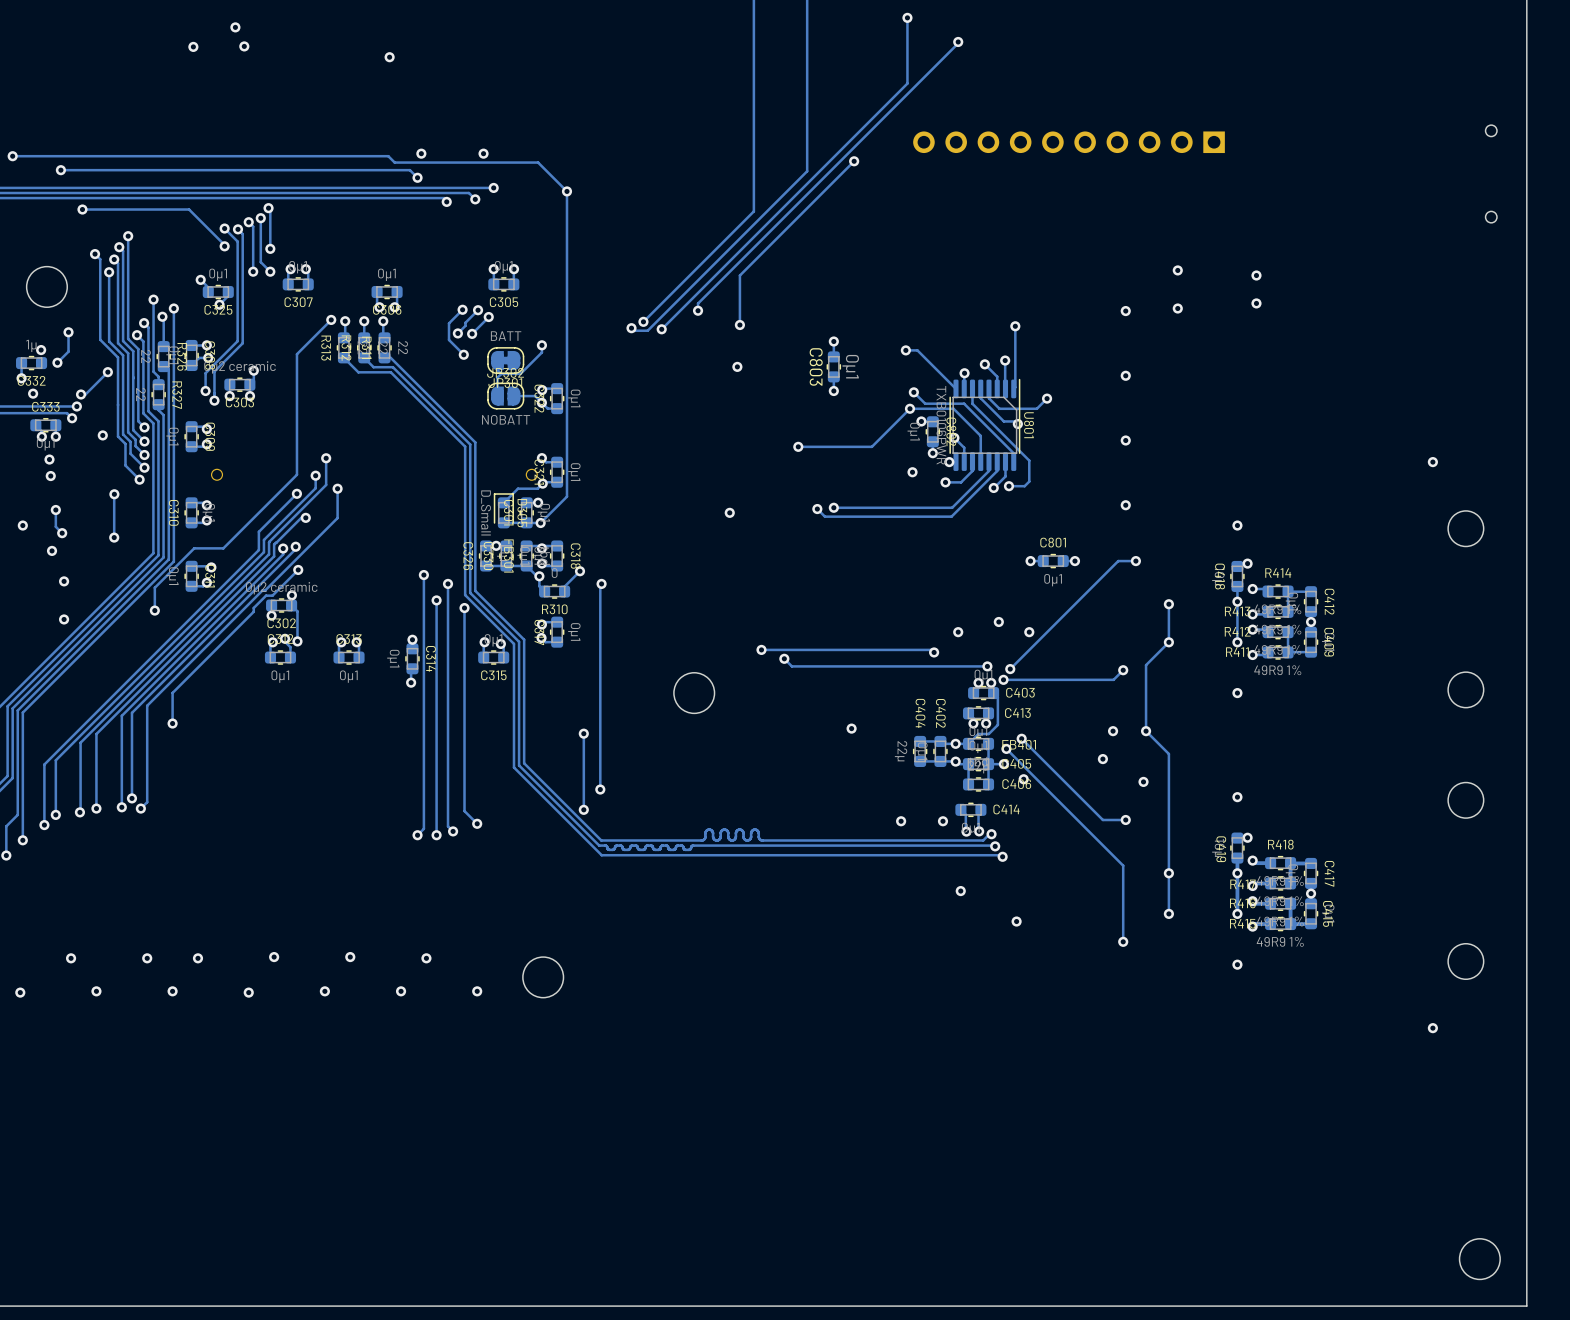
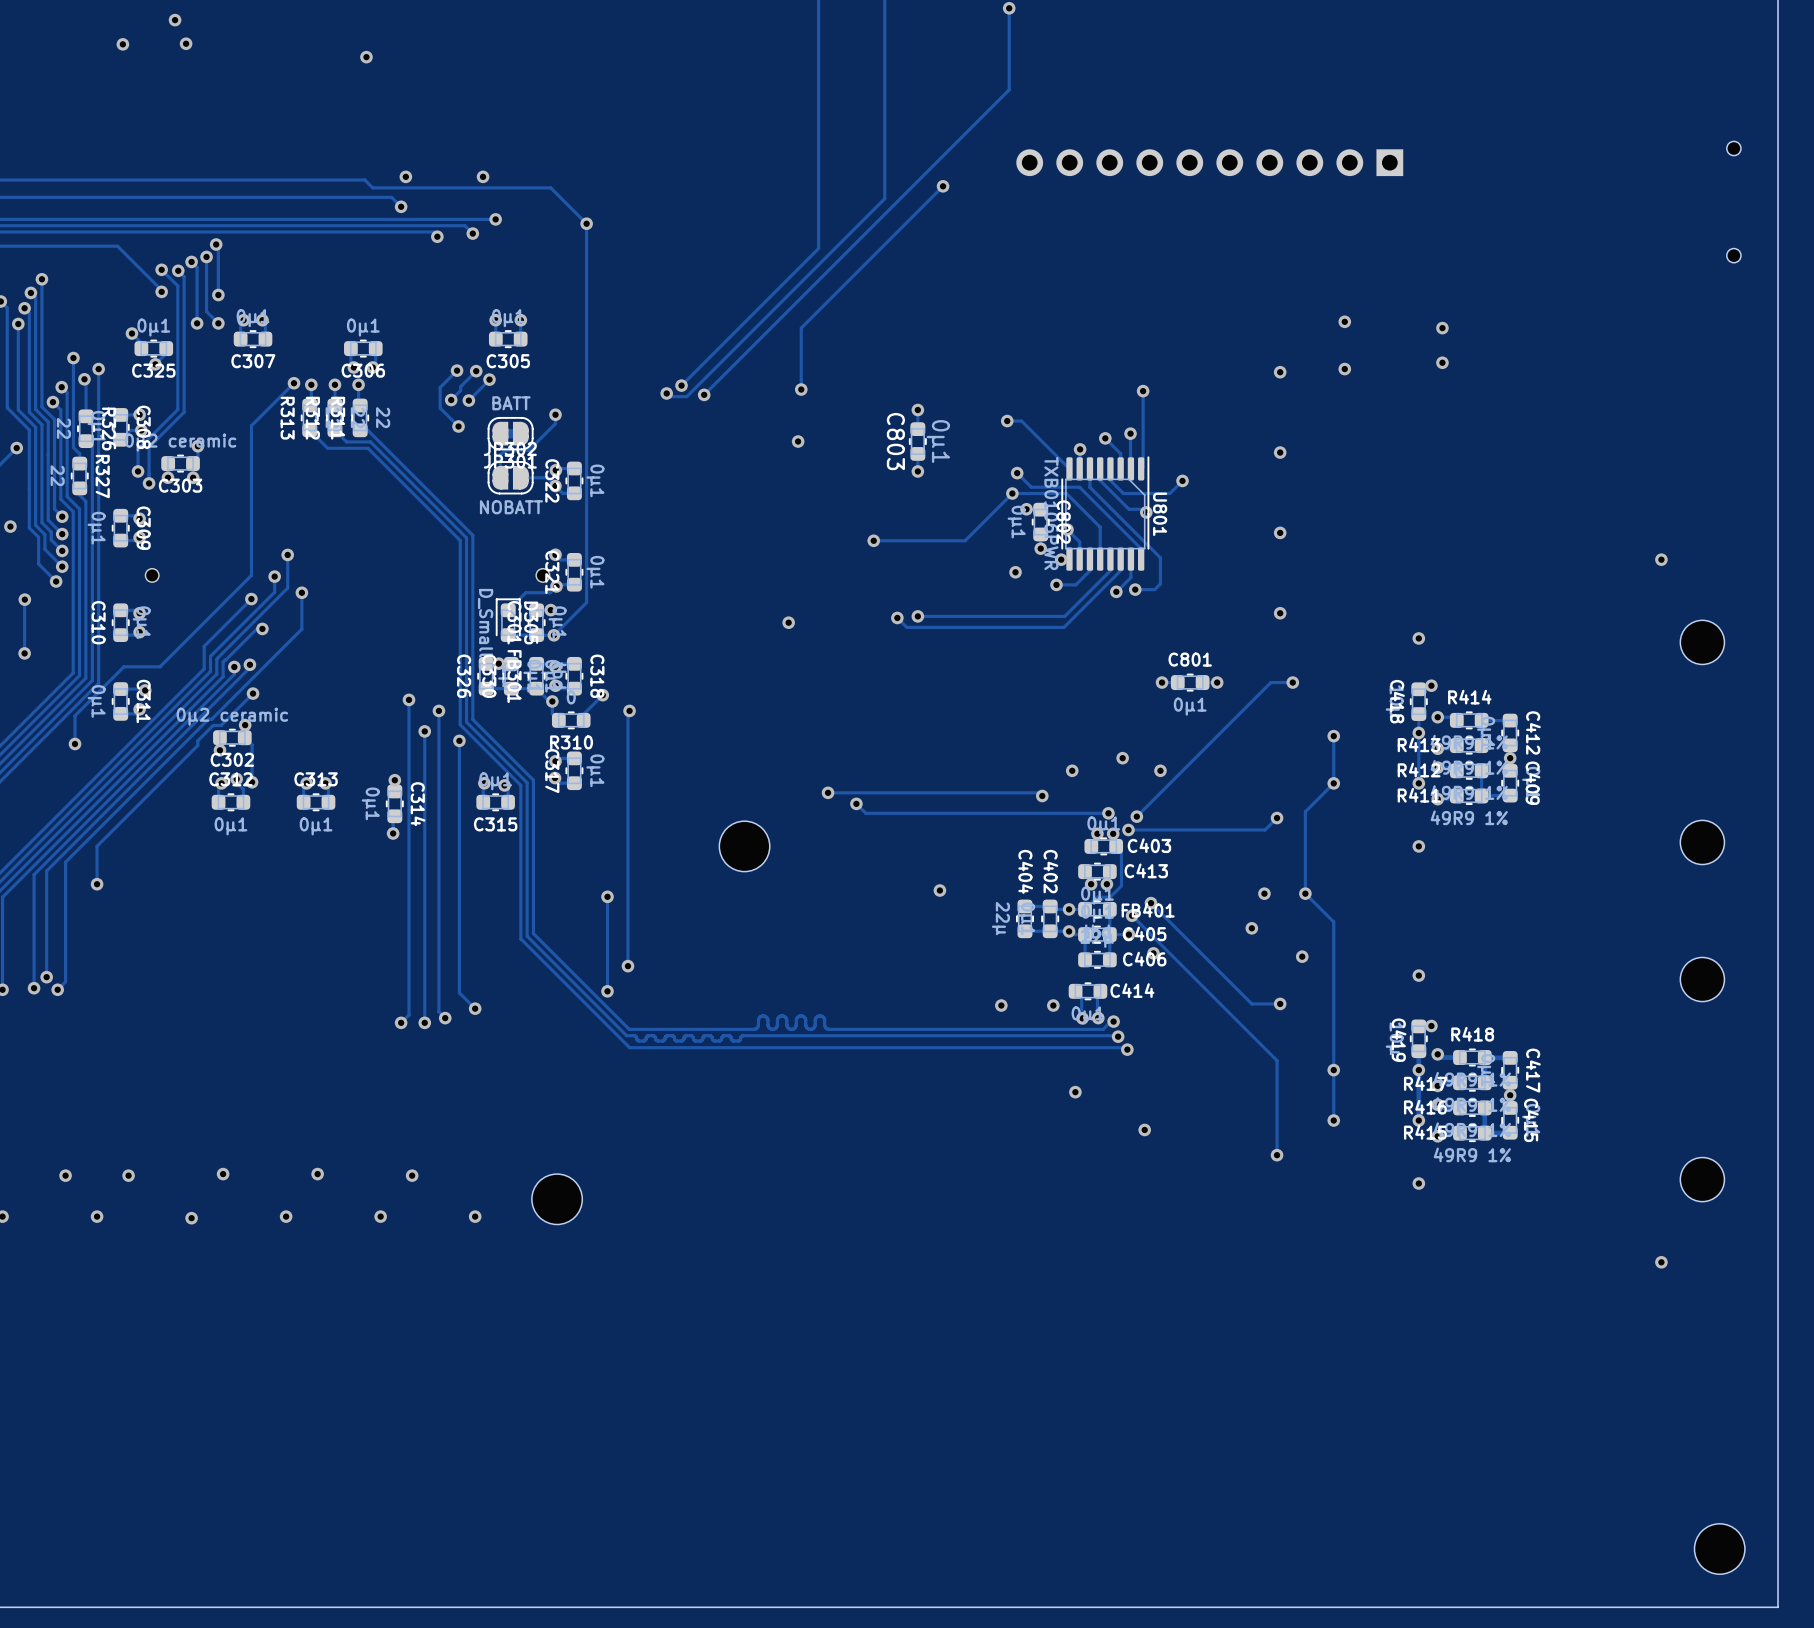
track: (958, 41) (698, 303) (698, 310) -> none
via: (958, 41) -> none
via: (698, 310) -> none

